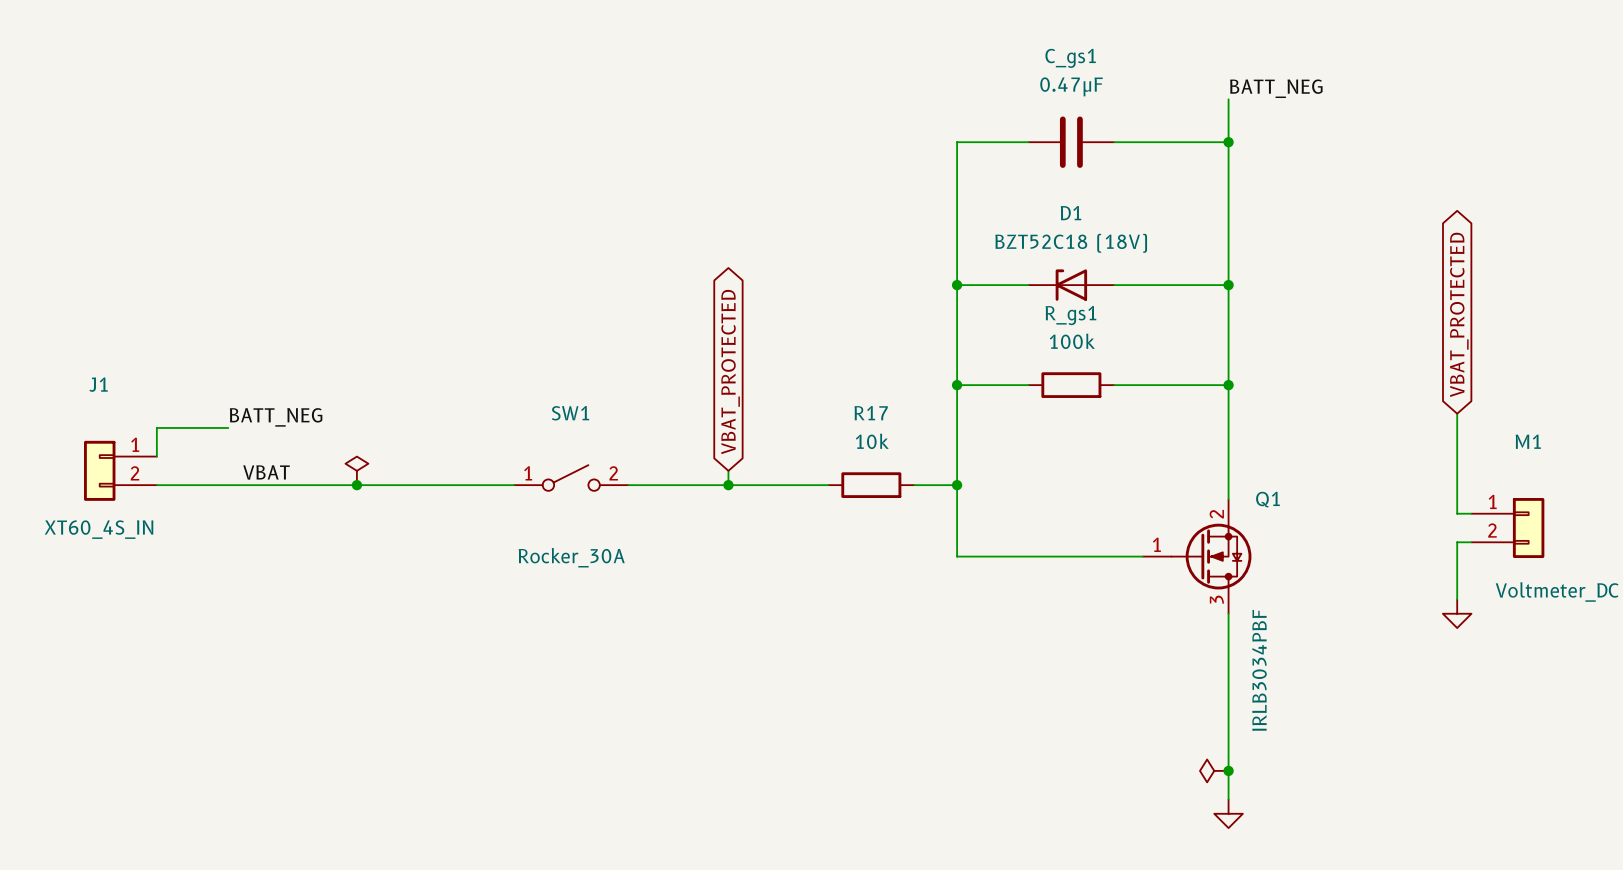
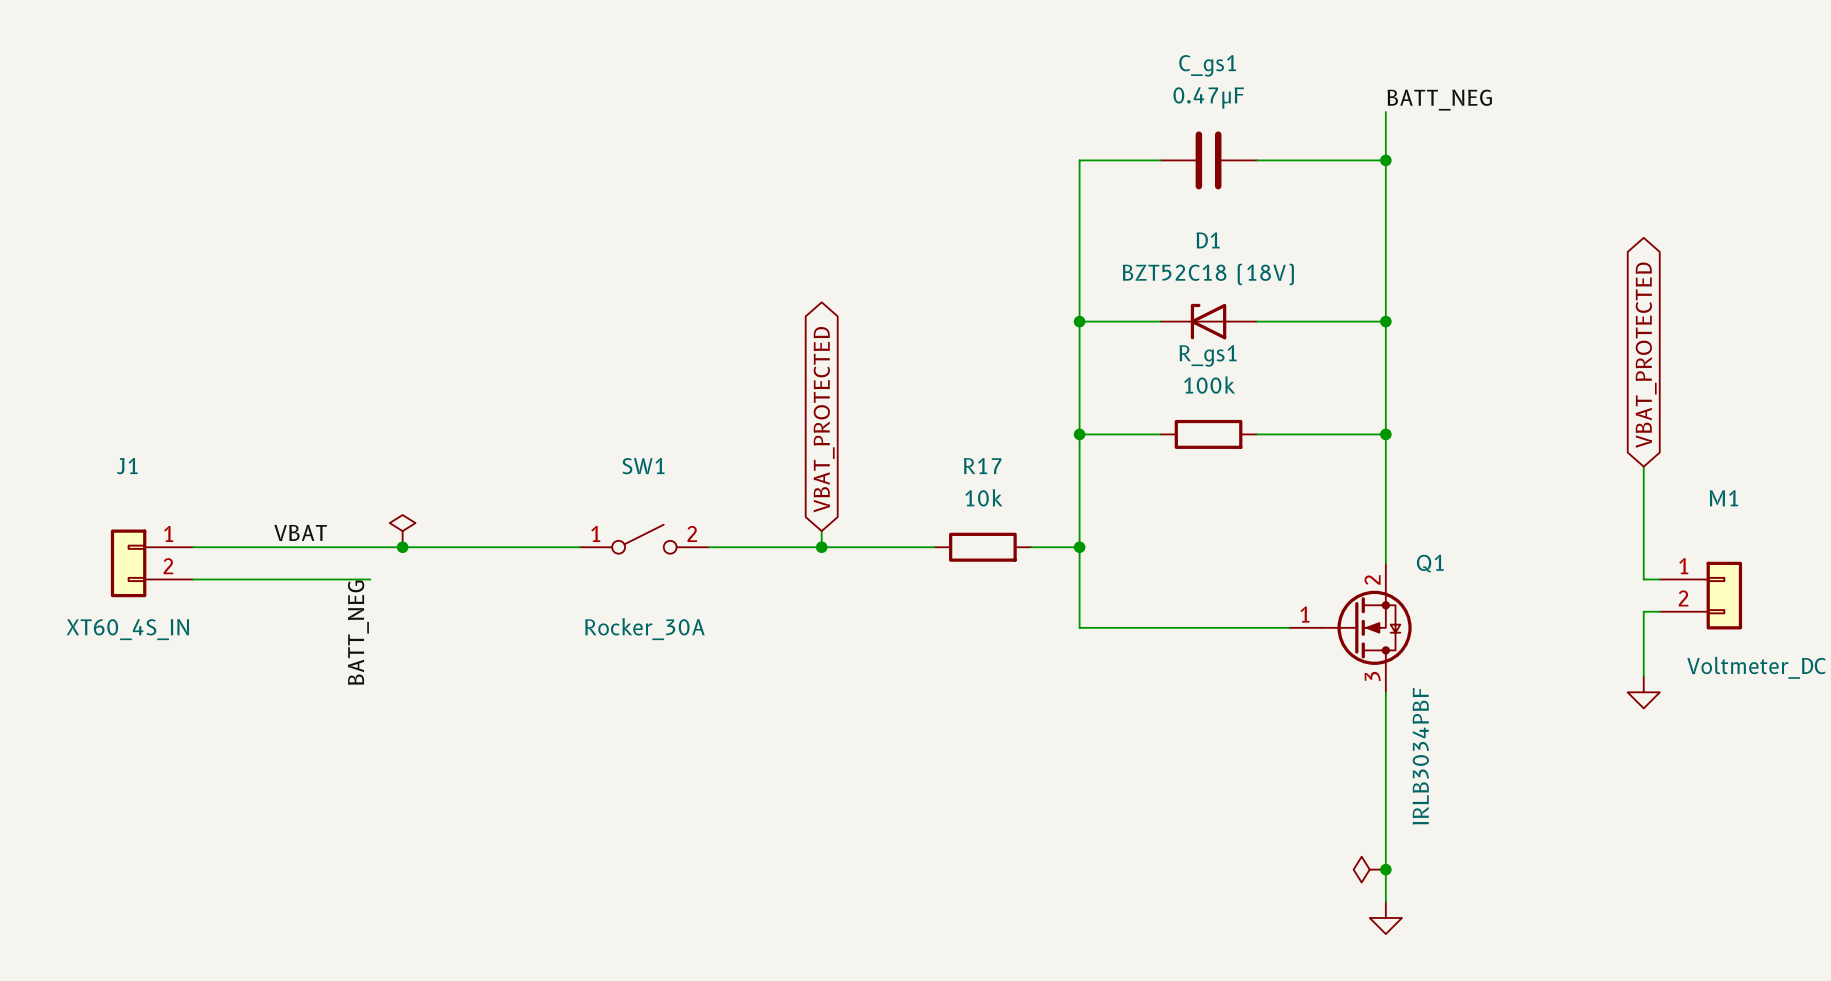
label rotation: 0° (276, 417) -> 90° counterclockwise (358, 632)
label position: BATT_NEG (276, 417) -> BATT_NEG (358, 632)
wire: (228, 427) (156, 427) (156, 456) -> none
J1 position: (120, 470) -> (151, 563)
wire: none -> (193, 579) (370, 579)

